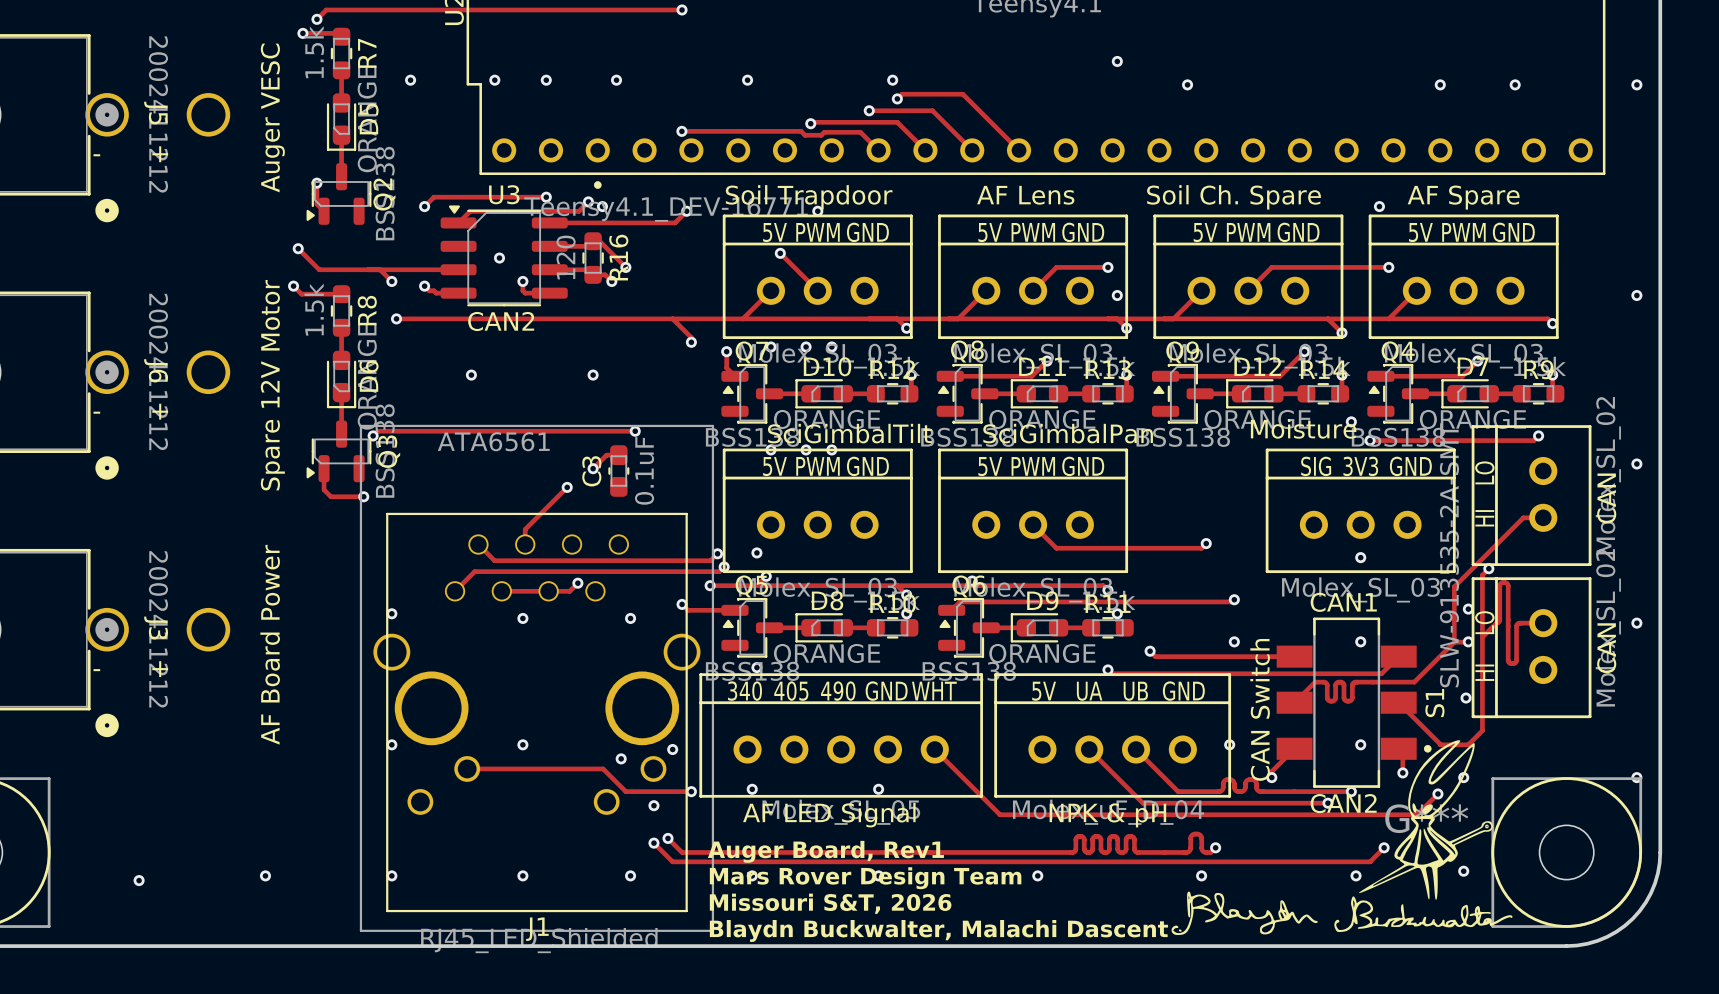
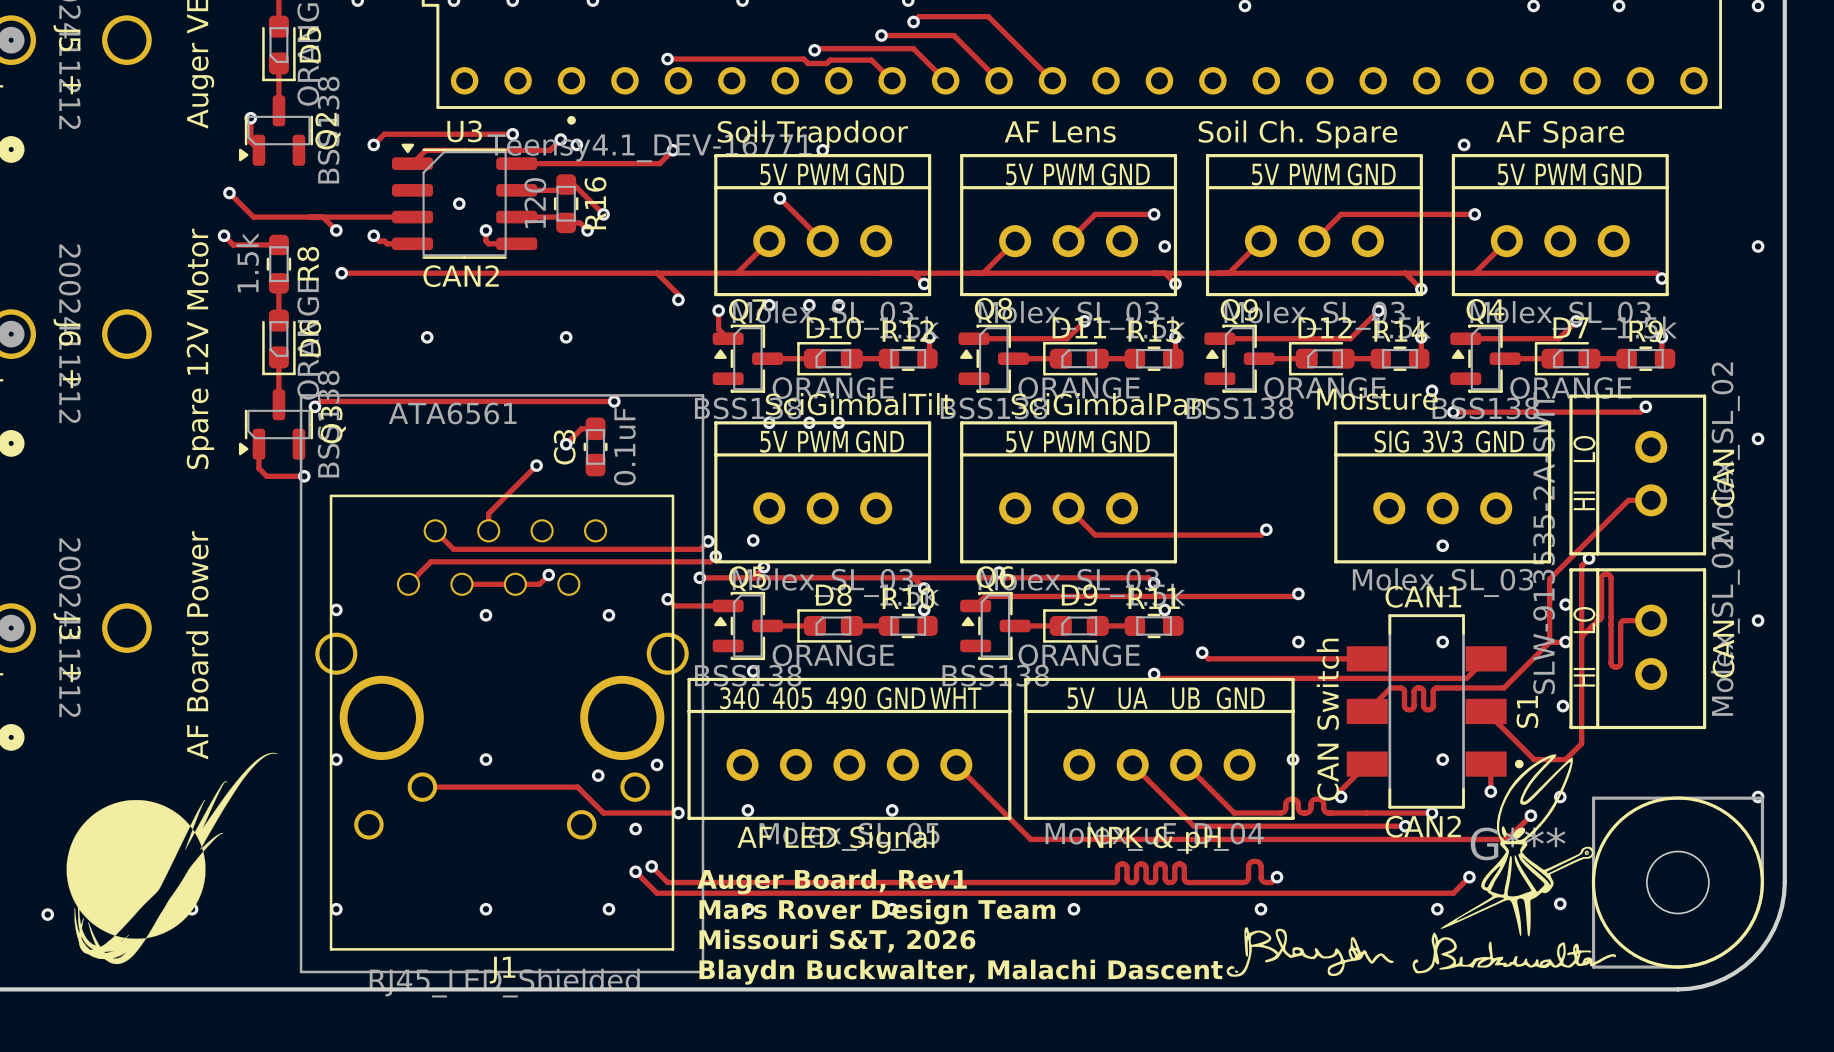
drawing: none -> [66, 752, 278, 965]

